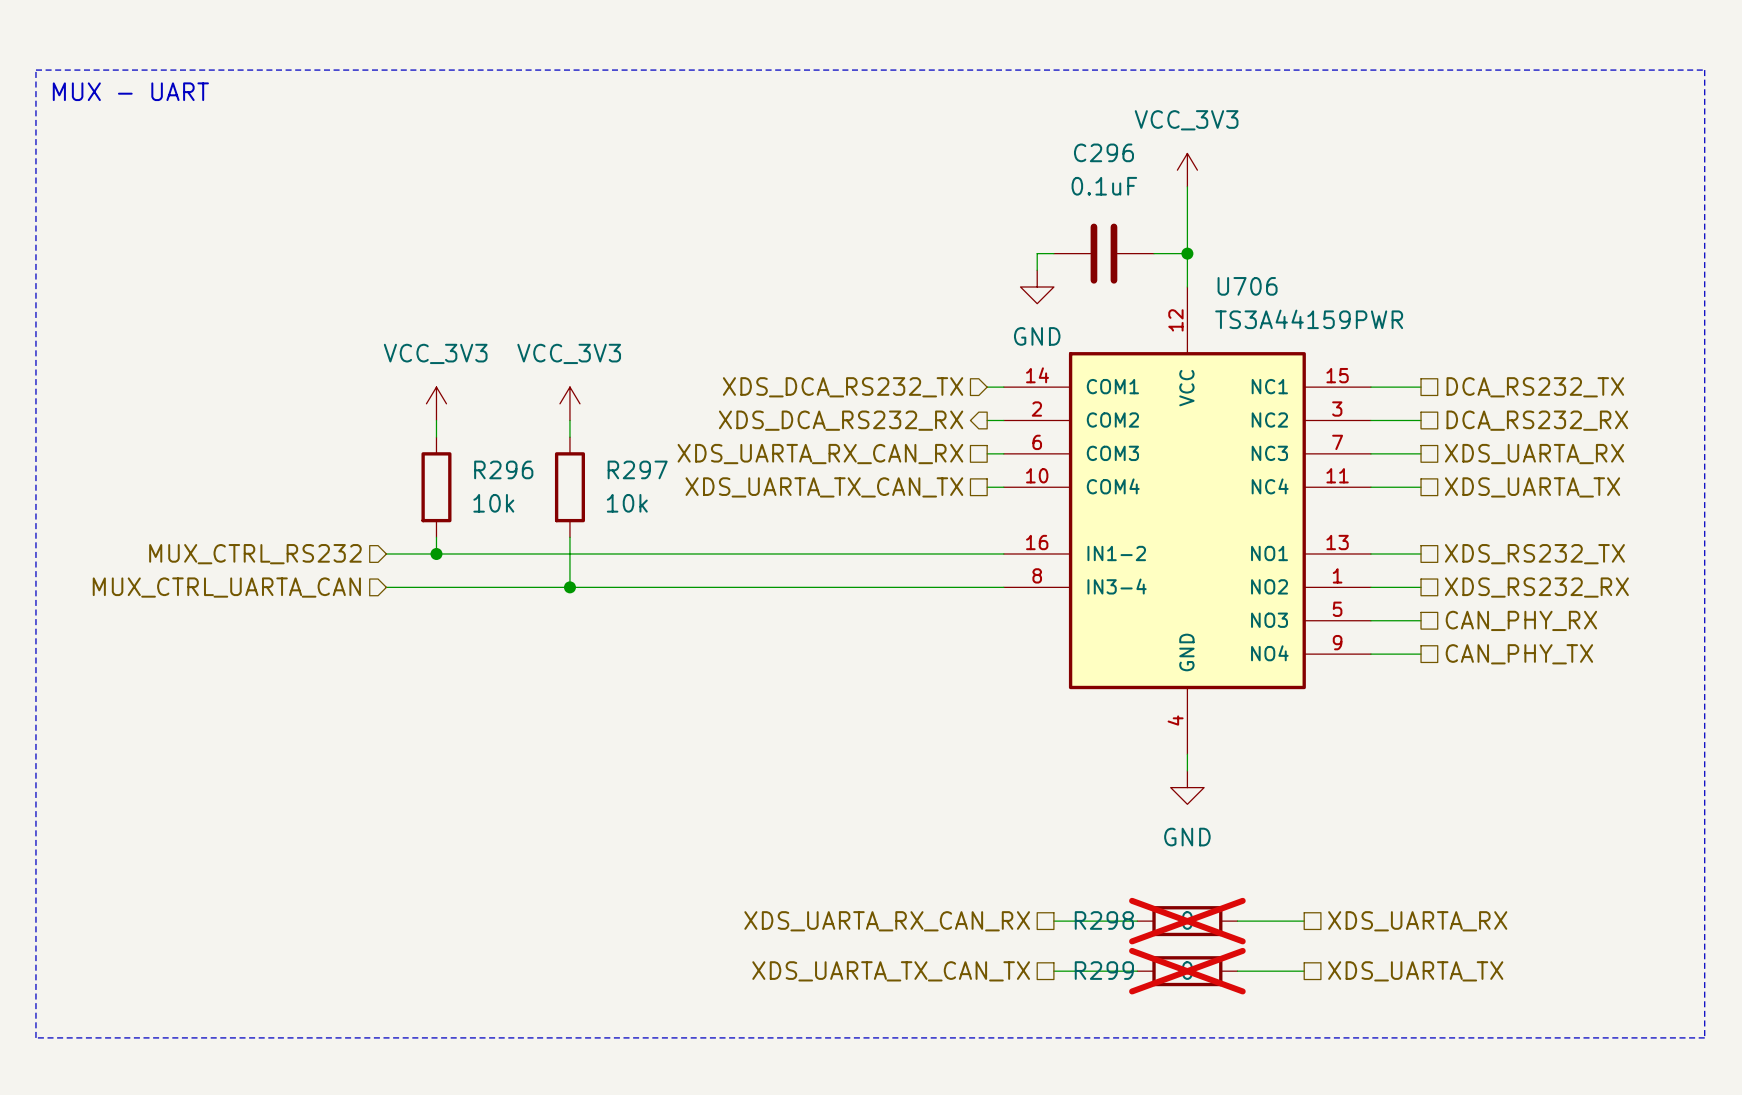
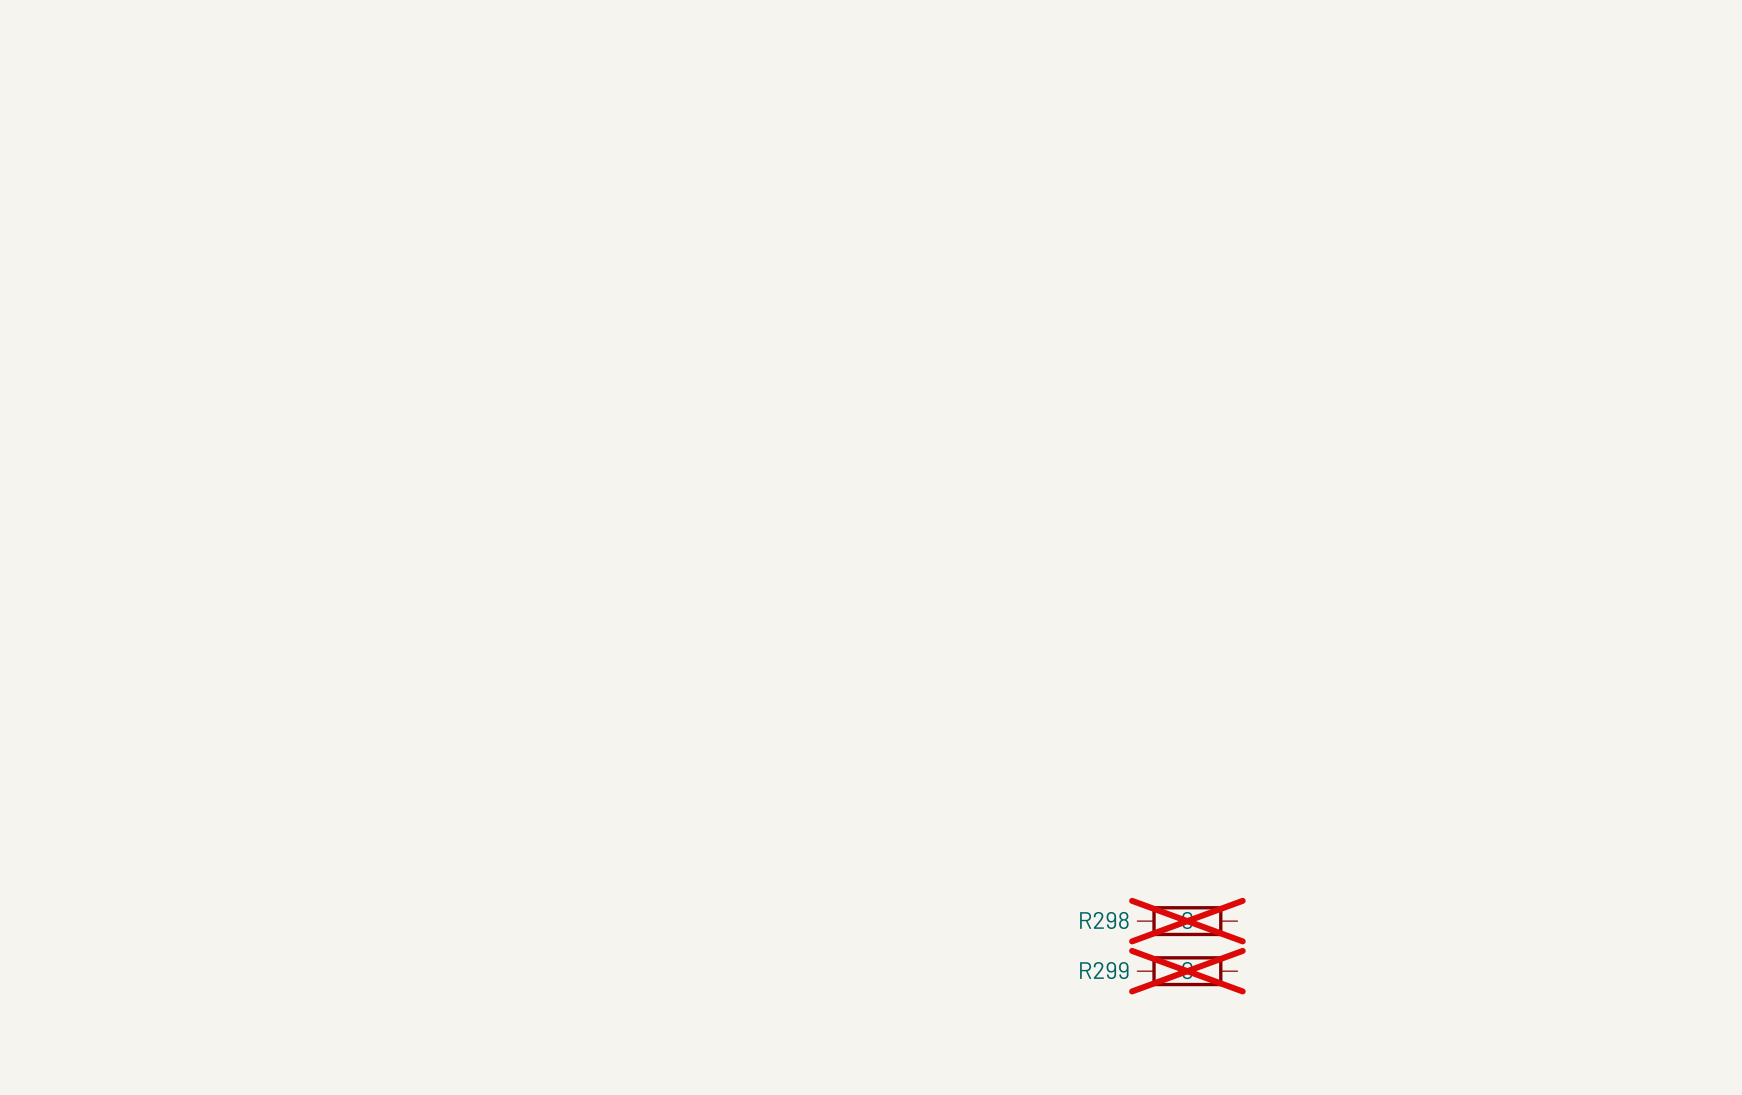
line: (35, 70) (1704, 70) (1704, 1037) (35, 1037) (35, 70) -> none
text: MUX - UART (130, 91) -> none
power symbol: VCC_3V3 (1187, 170) -> none
wire: (1187, 186) (1187, 286) -> none
wire: (1053, 253) (1037, 253) (1037, 270) -> none
C296: 0.1uF (1103, 253) -> none
wire: (1154, 253) (1187, 253) -> none
junction: (1187, 253) -> none
power symbol: GND (1037, 286) -> none
hierarchical label: XDS_DCA_RS232_TX (843, 387) -> none
wire: (987, 387) (1003, 387) -> none
wire: (1370, 387) (1421, 387) -> none
hierarchical label: DCA_RS232_TX (1535, 387) -> none
power symbol: VCC_3V3 (436, 403) -> none
power symbol: VCC_3V3 (569, 403) -> none
wire: (436, 420) (436, 437) -> none
wire: (569, 420) (569, 437) -> none
hierarchical label: XDS_DCA_RS232_RX (841, 420) -> none
wire: (987, 420) (1003, 420) -> none
wire: (1370, 420) (1421, 420) -> none
hierarchical label: DCA_RS232_RX (1537, 420) -> none
wire: (987, 453) (1003, 453) -> none
wire: (1370, 453) (1421, 453) -> none
hierarchical label: XDS_UARTA_RX_CAN_RX (820, 454) -> none
hierarchical label: XDS_UARTA_RX (1534, 454) -> none
R296: 10k (436, 487) -> none
R297: 10k (569, 487) -> none
hierarchical label: XDS_UARTA_TX_CAN_TX (824, 487) -> none
wire: (987, 487) (1003, 487) -> none
wire: (1370, 487) (1421, 487) -> none
hierarchical label: XDS_UARTA_TX (1532, 487) -> none
U706: TS3A44159PWR (1187, 520) -> none
wire: (436, 537) (436, 553) -> none
wire: (569, 537) (569, 587) -> none
wire: (386, 553) (1003, 553) -> none
junction: (436, 553) -> none
wire: (1370, 553) (1421, 553) -> none
hierarchical label: MUX_CTRL_RS232 (255, 554) -> none
hierarchical label: XDS_RS232_TX (1534, 554) -> none
hierarchical label: MUX_CTRL_UARTA_CAN (226, 587) -> none
wire: (386, 587) (1003, 587) -> none
junction: (569, 587) -> none
wire: (1370, 587) (1421, 587) -> none
hierarchical label: XDS_RS232_RX (1536, 587) -> none
wire: (1370, 620) (1421, 620) -> none
hierarchical label: CAN_PHY_RX (1521, 620) -> none
wire: (1370, 654) (1421, 654) -> none
hierarchical label: CAN_PHY_TX (1519, 654) -> none
wire: (1187, 754) (1187, 770) -> none
power symbol: GND (1187, 787) -> none
hierarchical label: XDS_UARTA_RX_CAN_RX (887, 921) -> none
wire: (1053, 921) (1137, 921) -> none
wire: (1237, 921) (1304, 921) -> none
hierarchical label: XDS_UARTA_RX (1417, 921) -> none
hierarchical label: XDS_UARTA_TX_CAN_TX (891, 971) -> none
wire: (1053, 971) (1137, 971) -> none
wire: (1237, 971) (1304, 971) -> none
hierarchical label: XDS_UARTA_TX (1415, 971) -> none

